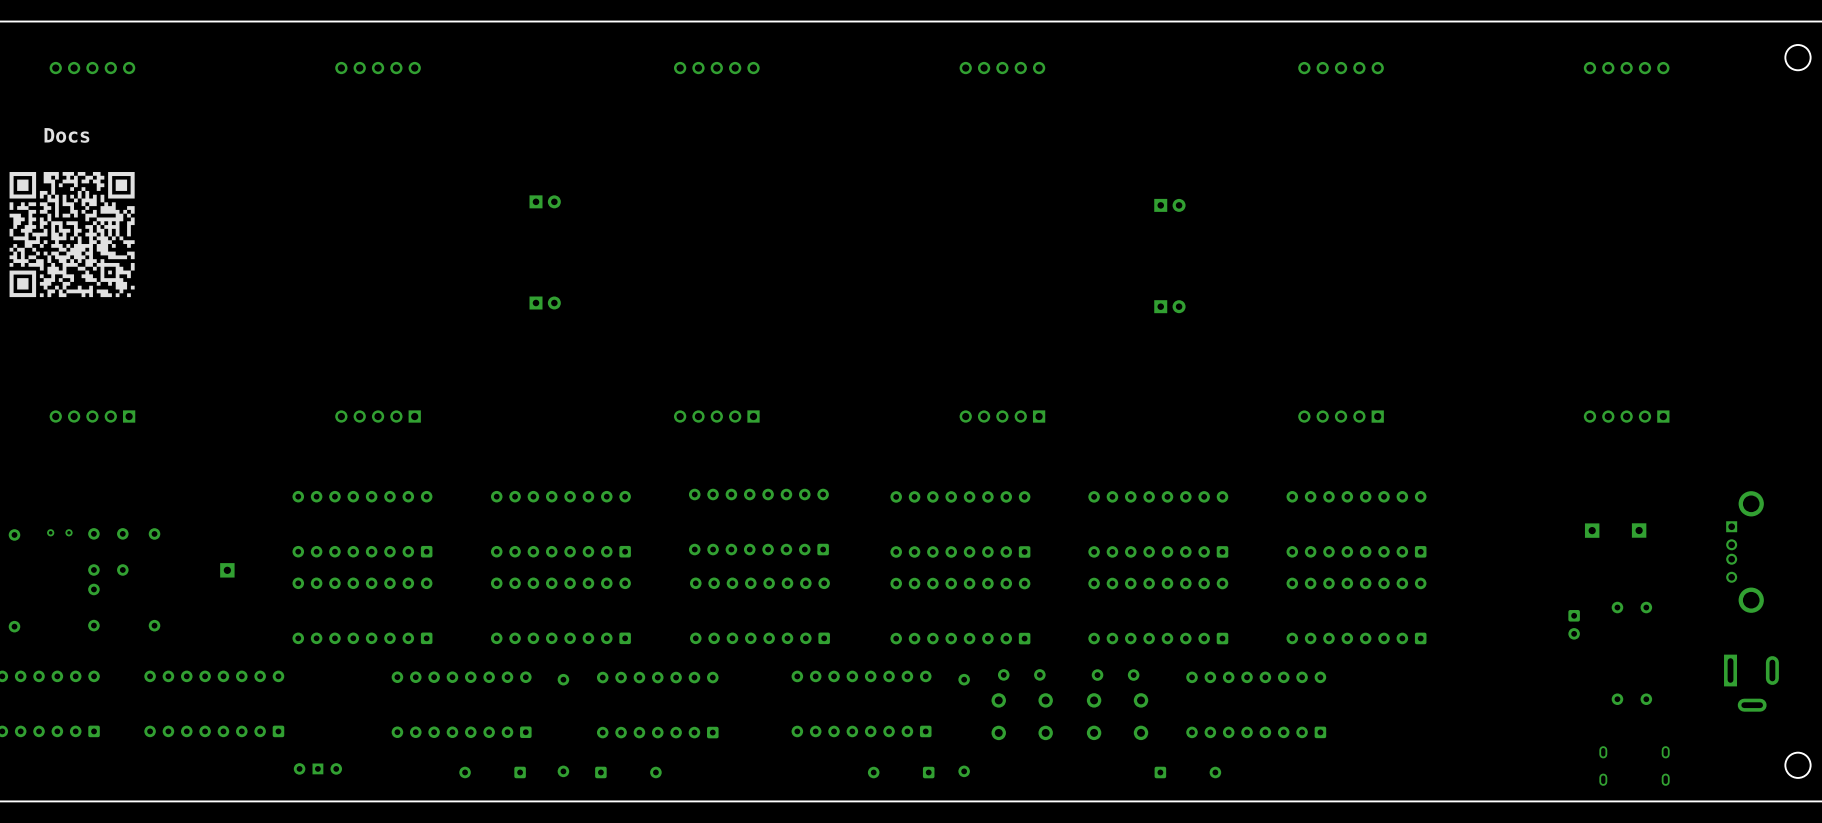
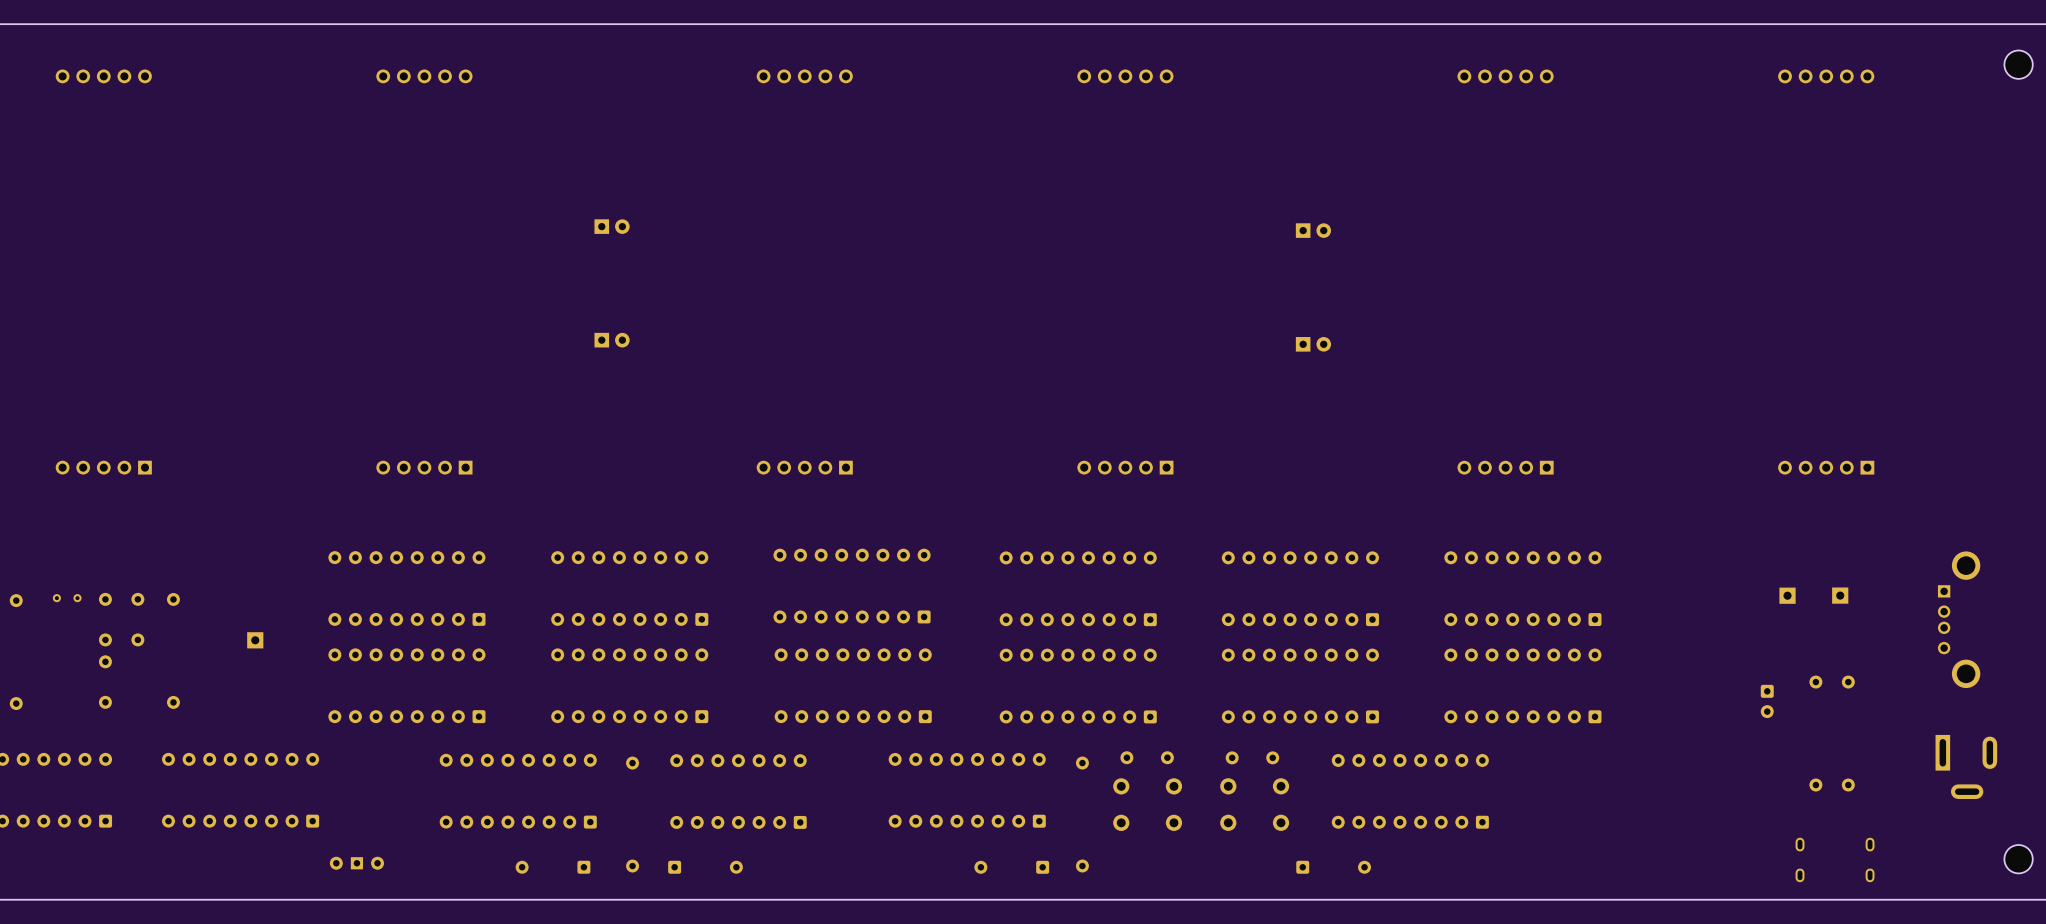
text: Docs (66, 135) -> none
drawing: [9, 171, 135, 298] -> none

